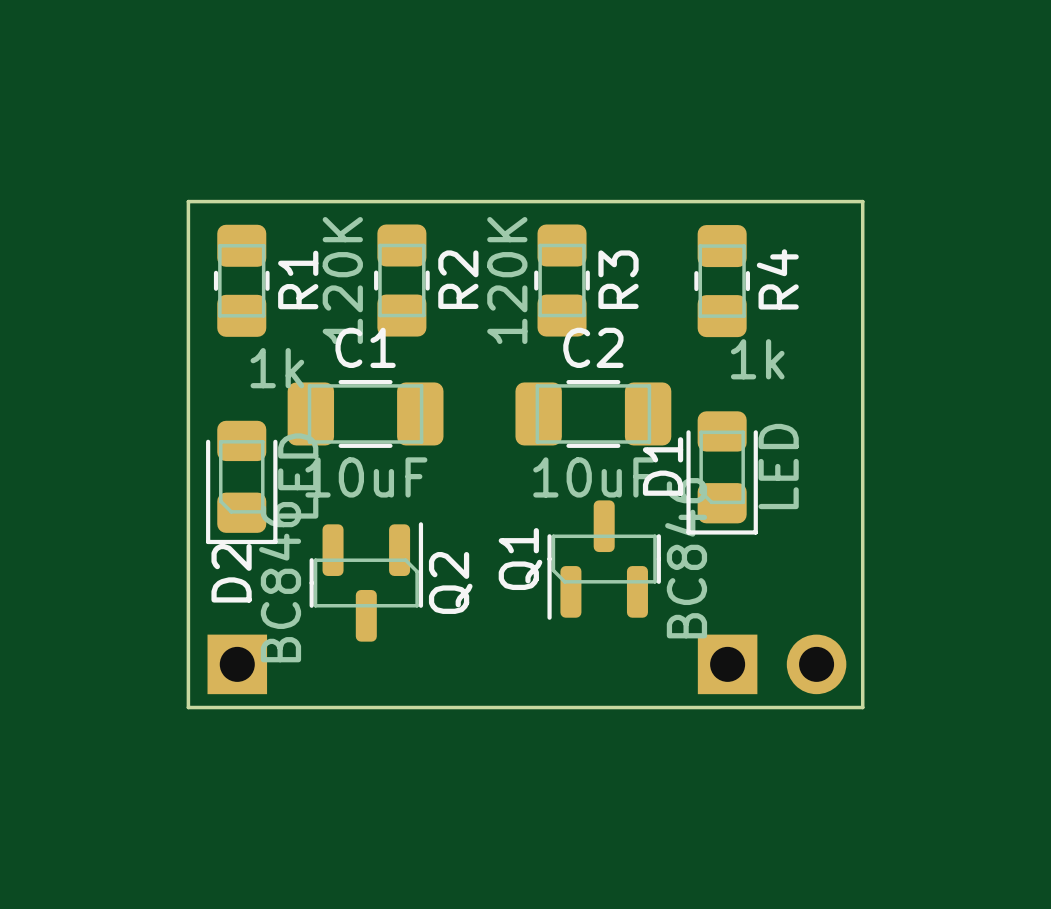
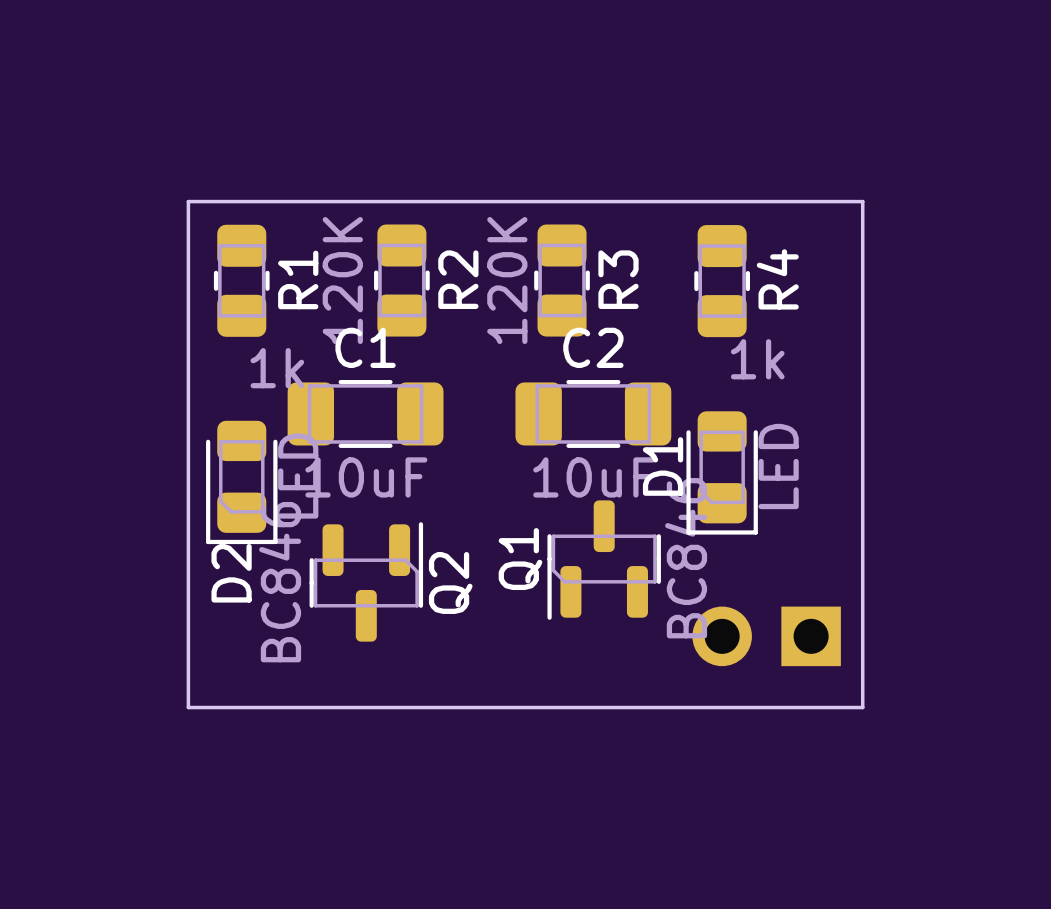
part: (237, 664) -> none
part rotation: 0° (772, 664) -> 180° (766, 636)

